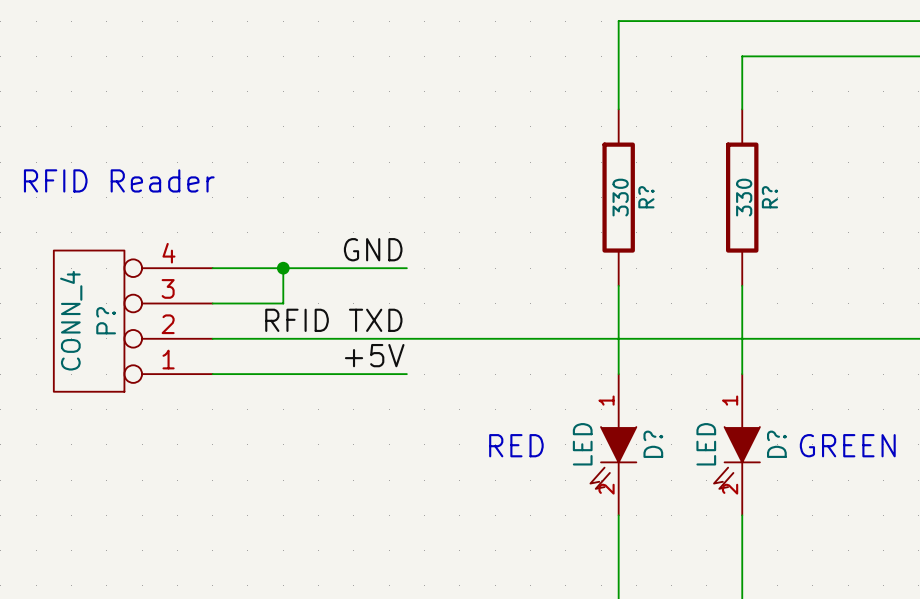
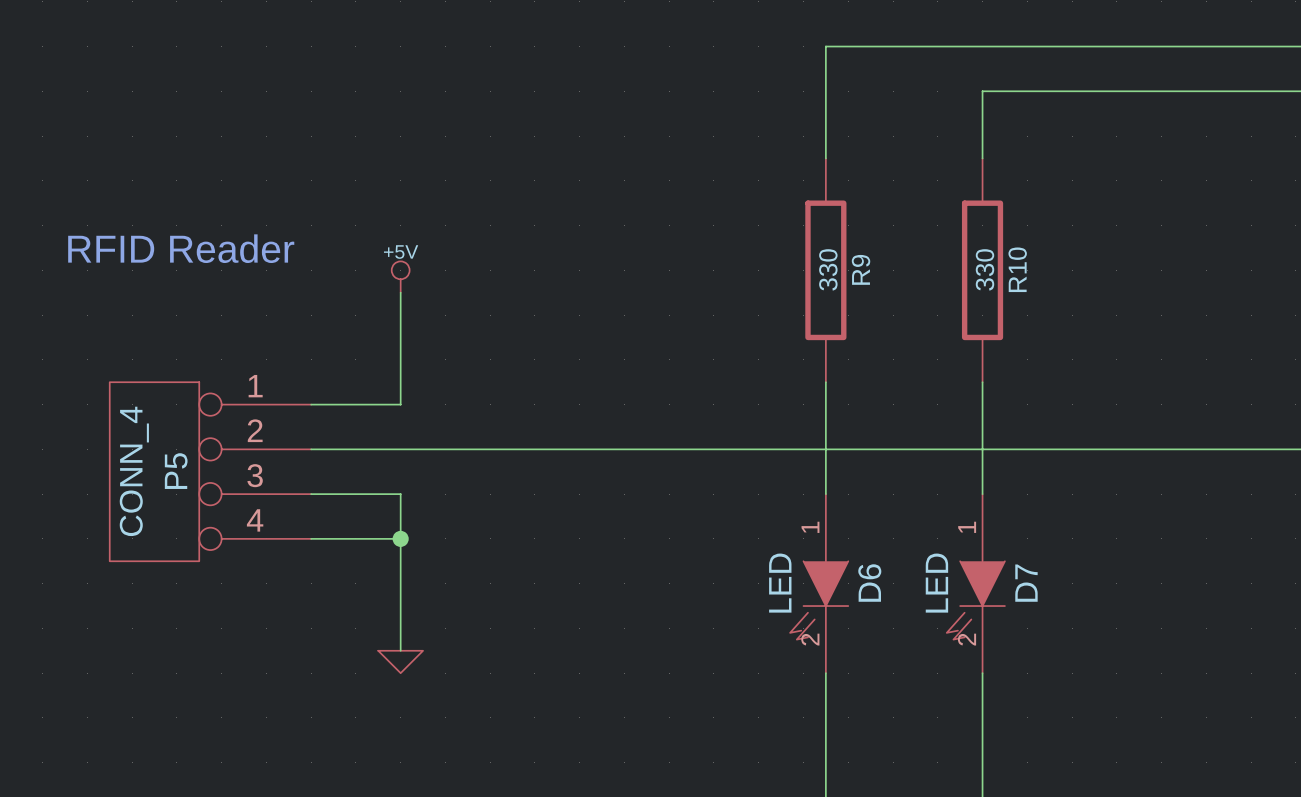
R? name: R? (646, 197) -> R9 (861, 269)
R? name: R? (769, 197) -> R10 (1017, 269)
power symbol: none -> +5V (400, 277)
wire: none -> (400, 292) (400, 359)
label: GND (373, 249) -> none
wire: (212, 268) (406, 268) -> none
junction: (283, 268) -> none
label: RFID TXD (333, 320) -> none
P?: CONN_4 (133, 321) -> none
label: +5V (374, 355) -> none
P5: none -> CONN_4 (210, 471)
wire: (283, 374) (406, 374) -> (400, 494) (400, 650)
wire: none -> (311, 538) (400, 538)
junction: none -> (400, 538)
D? name: D? (653, 444) -> D6 (869, 583)
D? name: D? (776, 444) -> D7 (1026, 583)
text: RED (516, 445) -> none
text: GREEN (847, 445) -> none
power symbol: none -> (400, 661)

